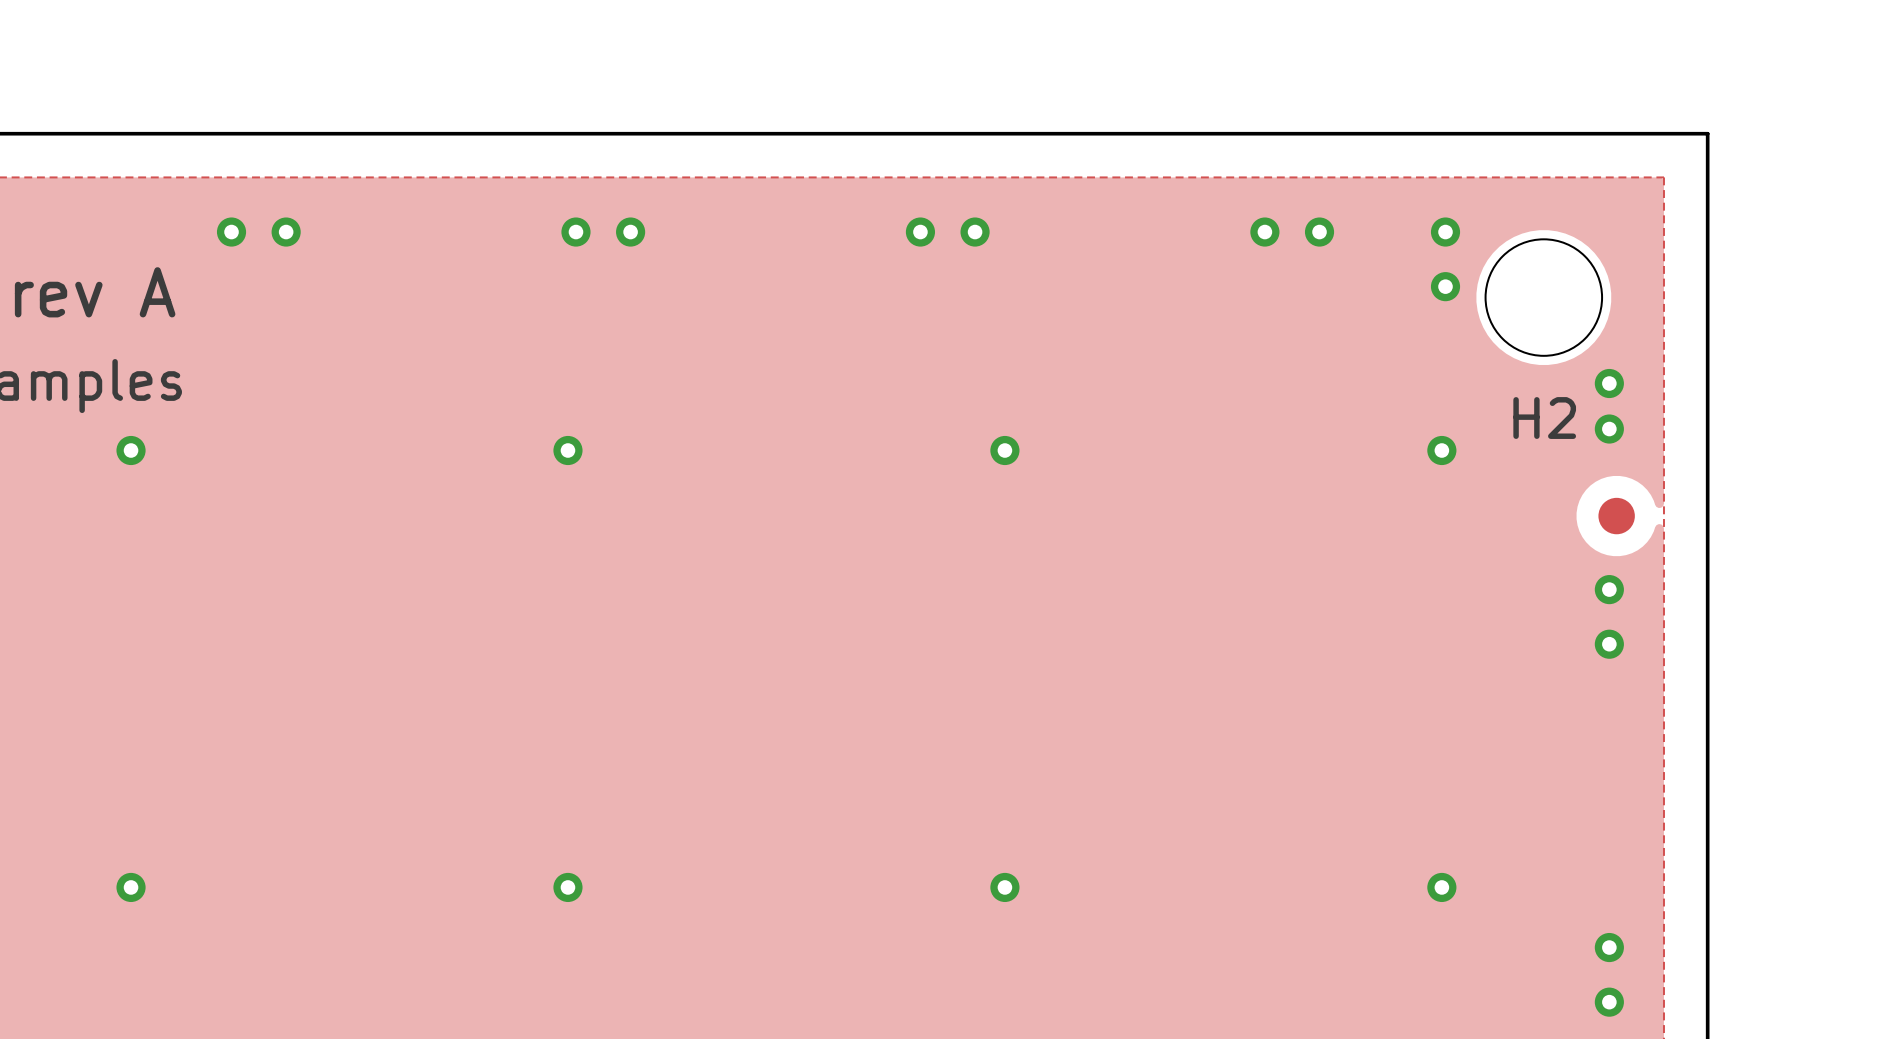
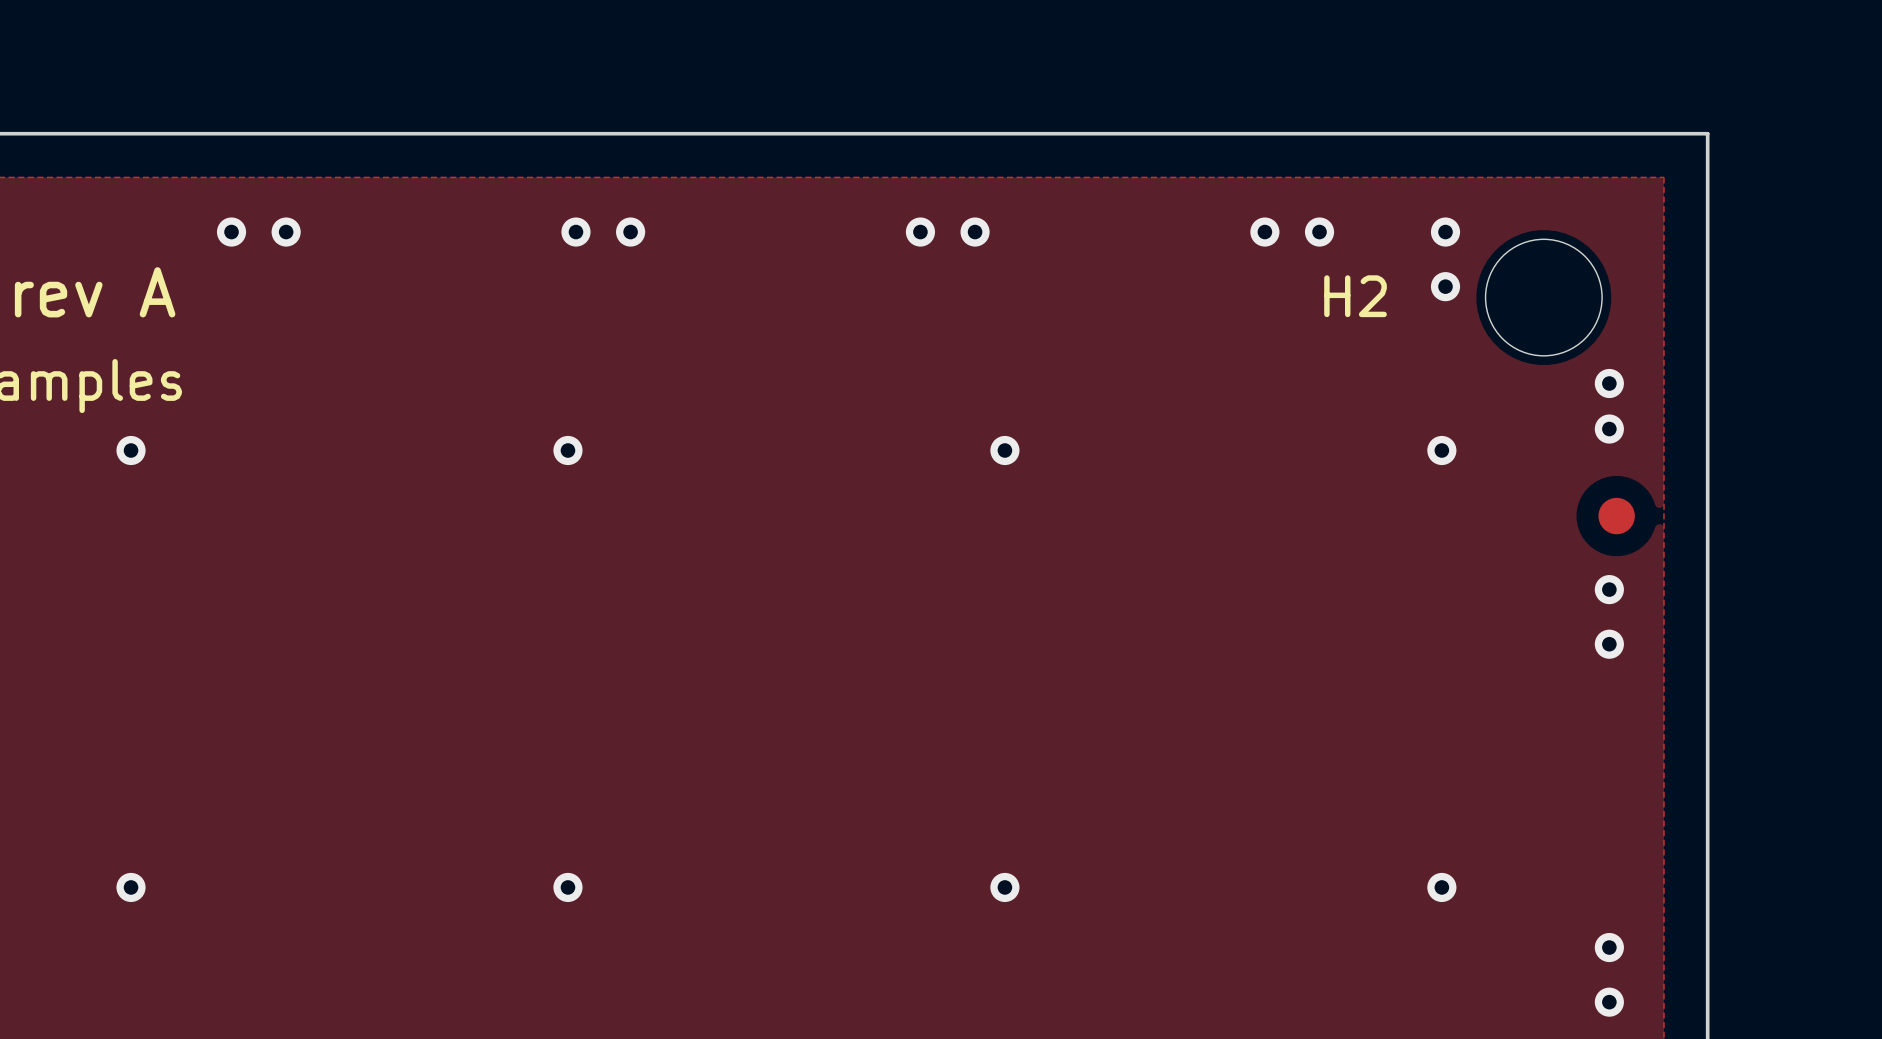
H2 name position: H2 (1544, 418) -> H2 (1355, 296)

